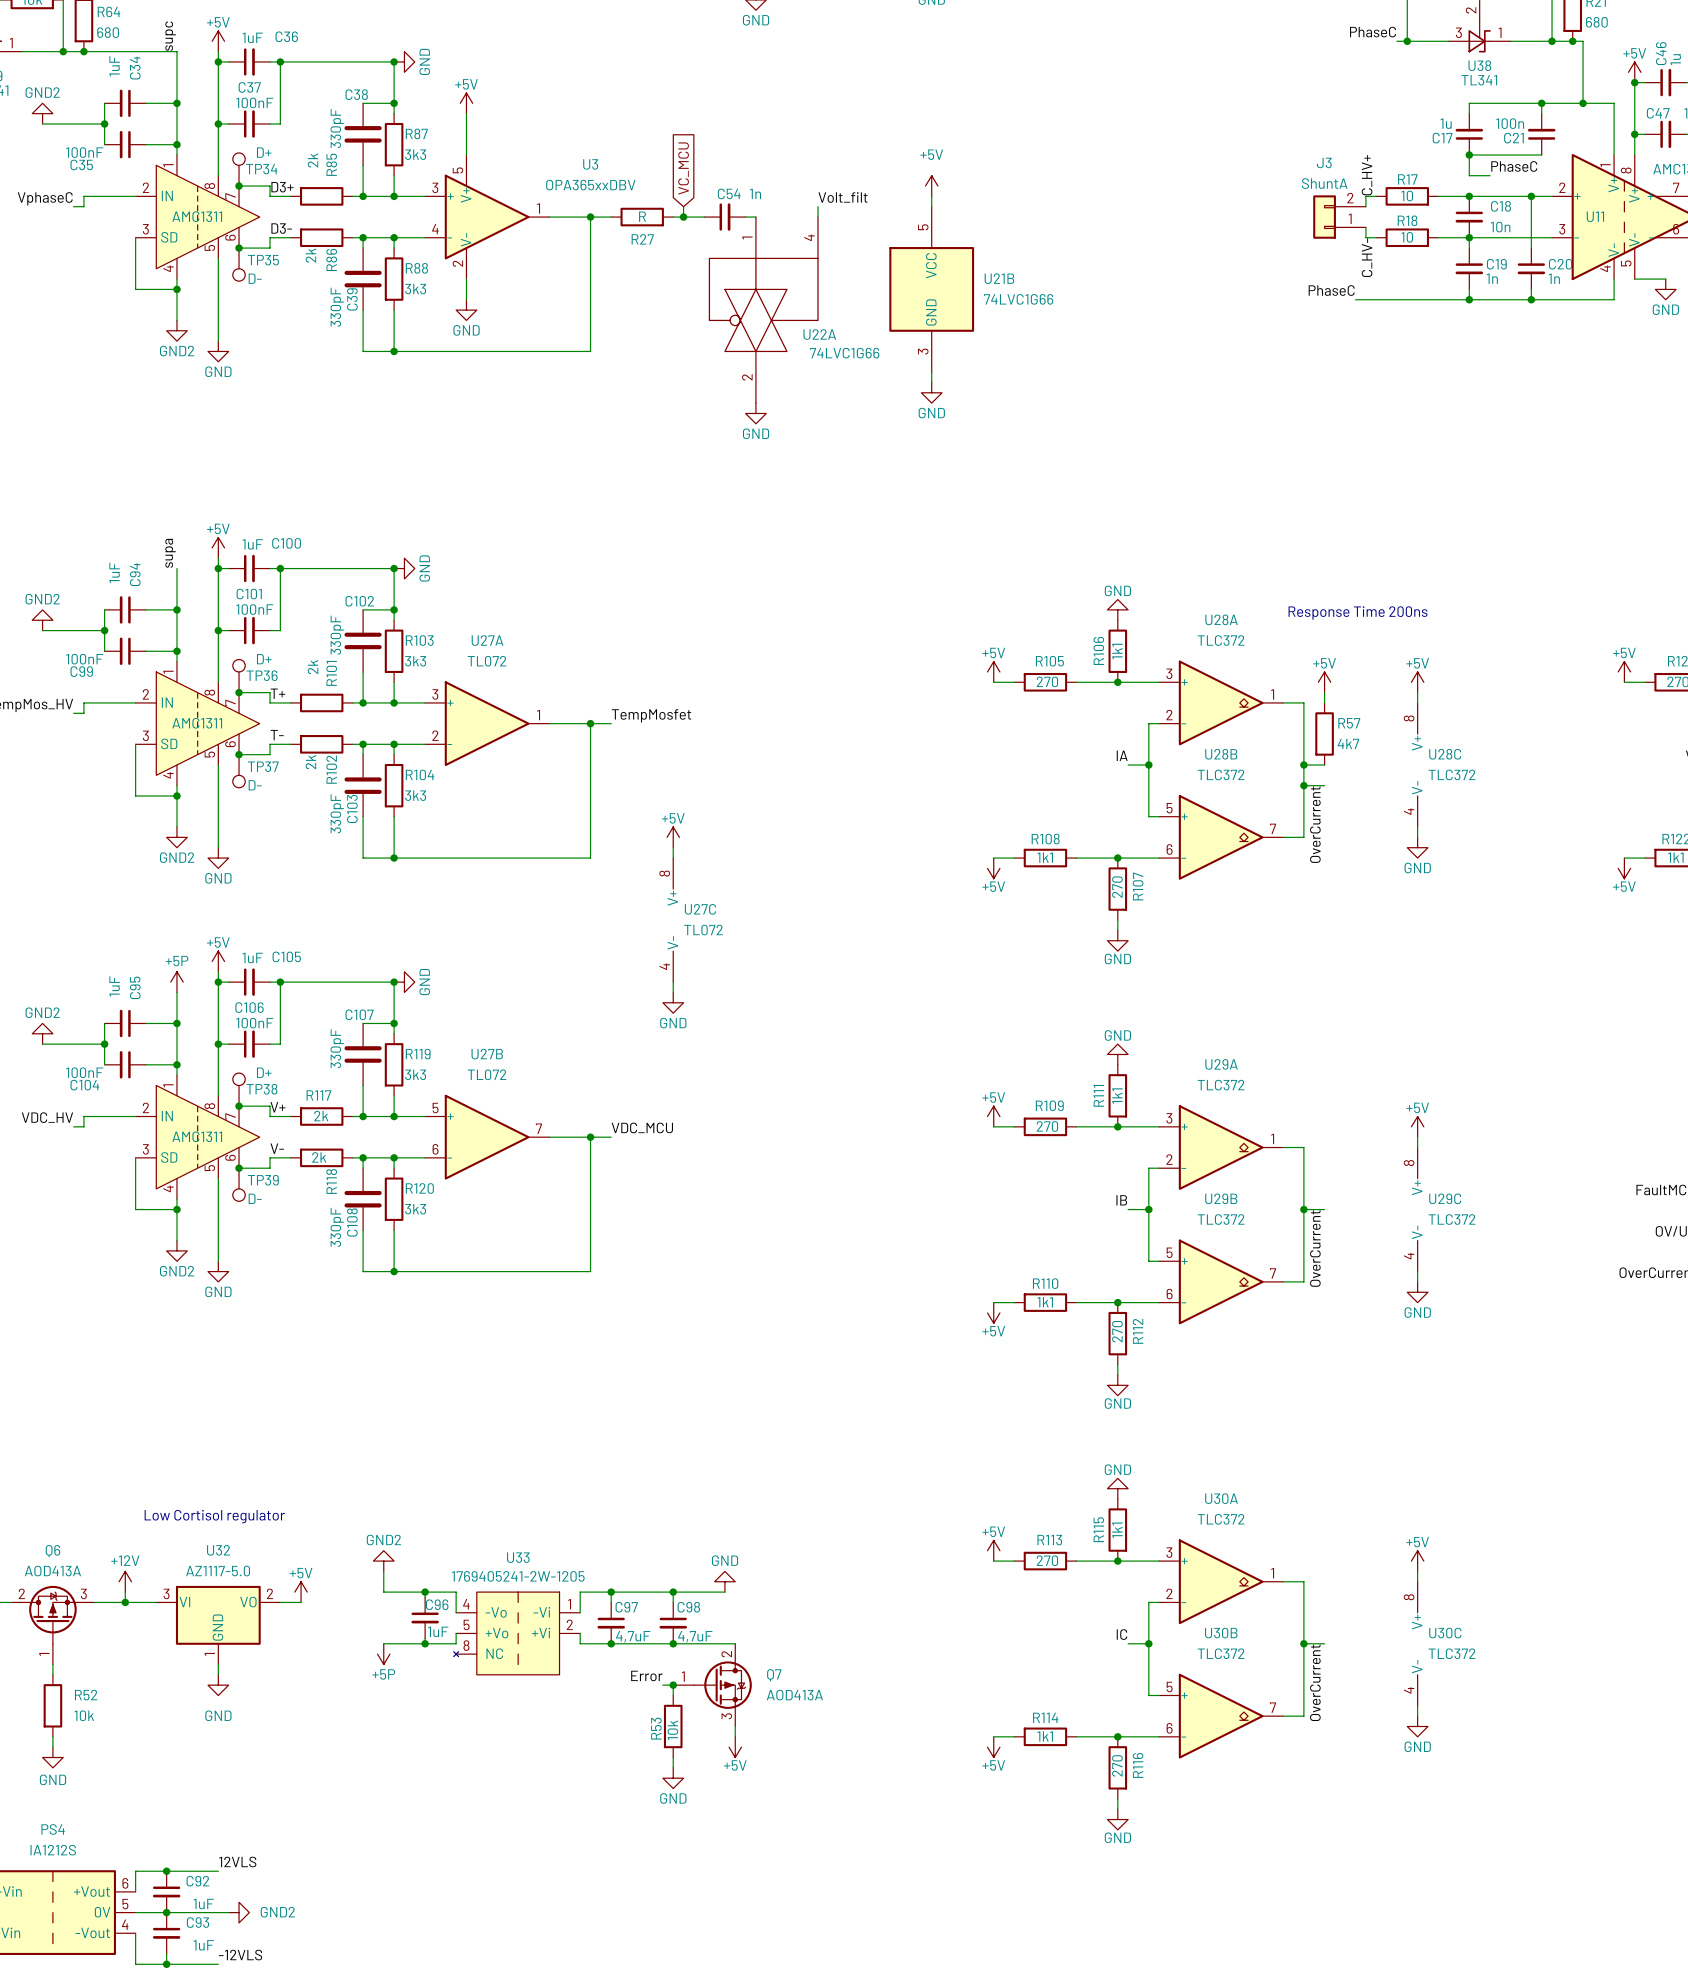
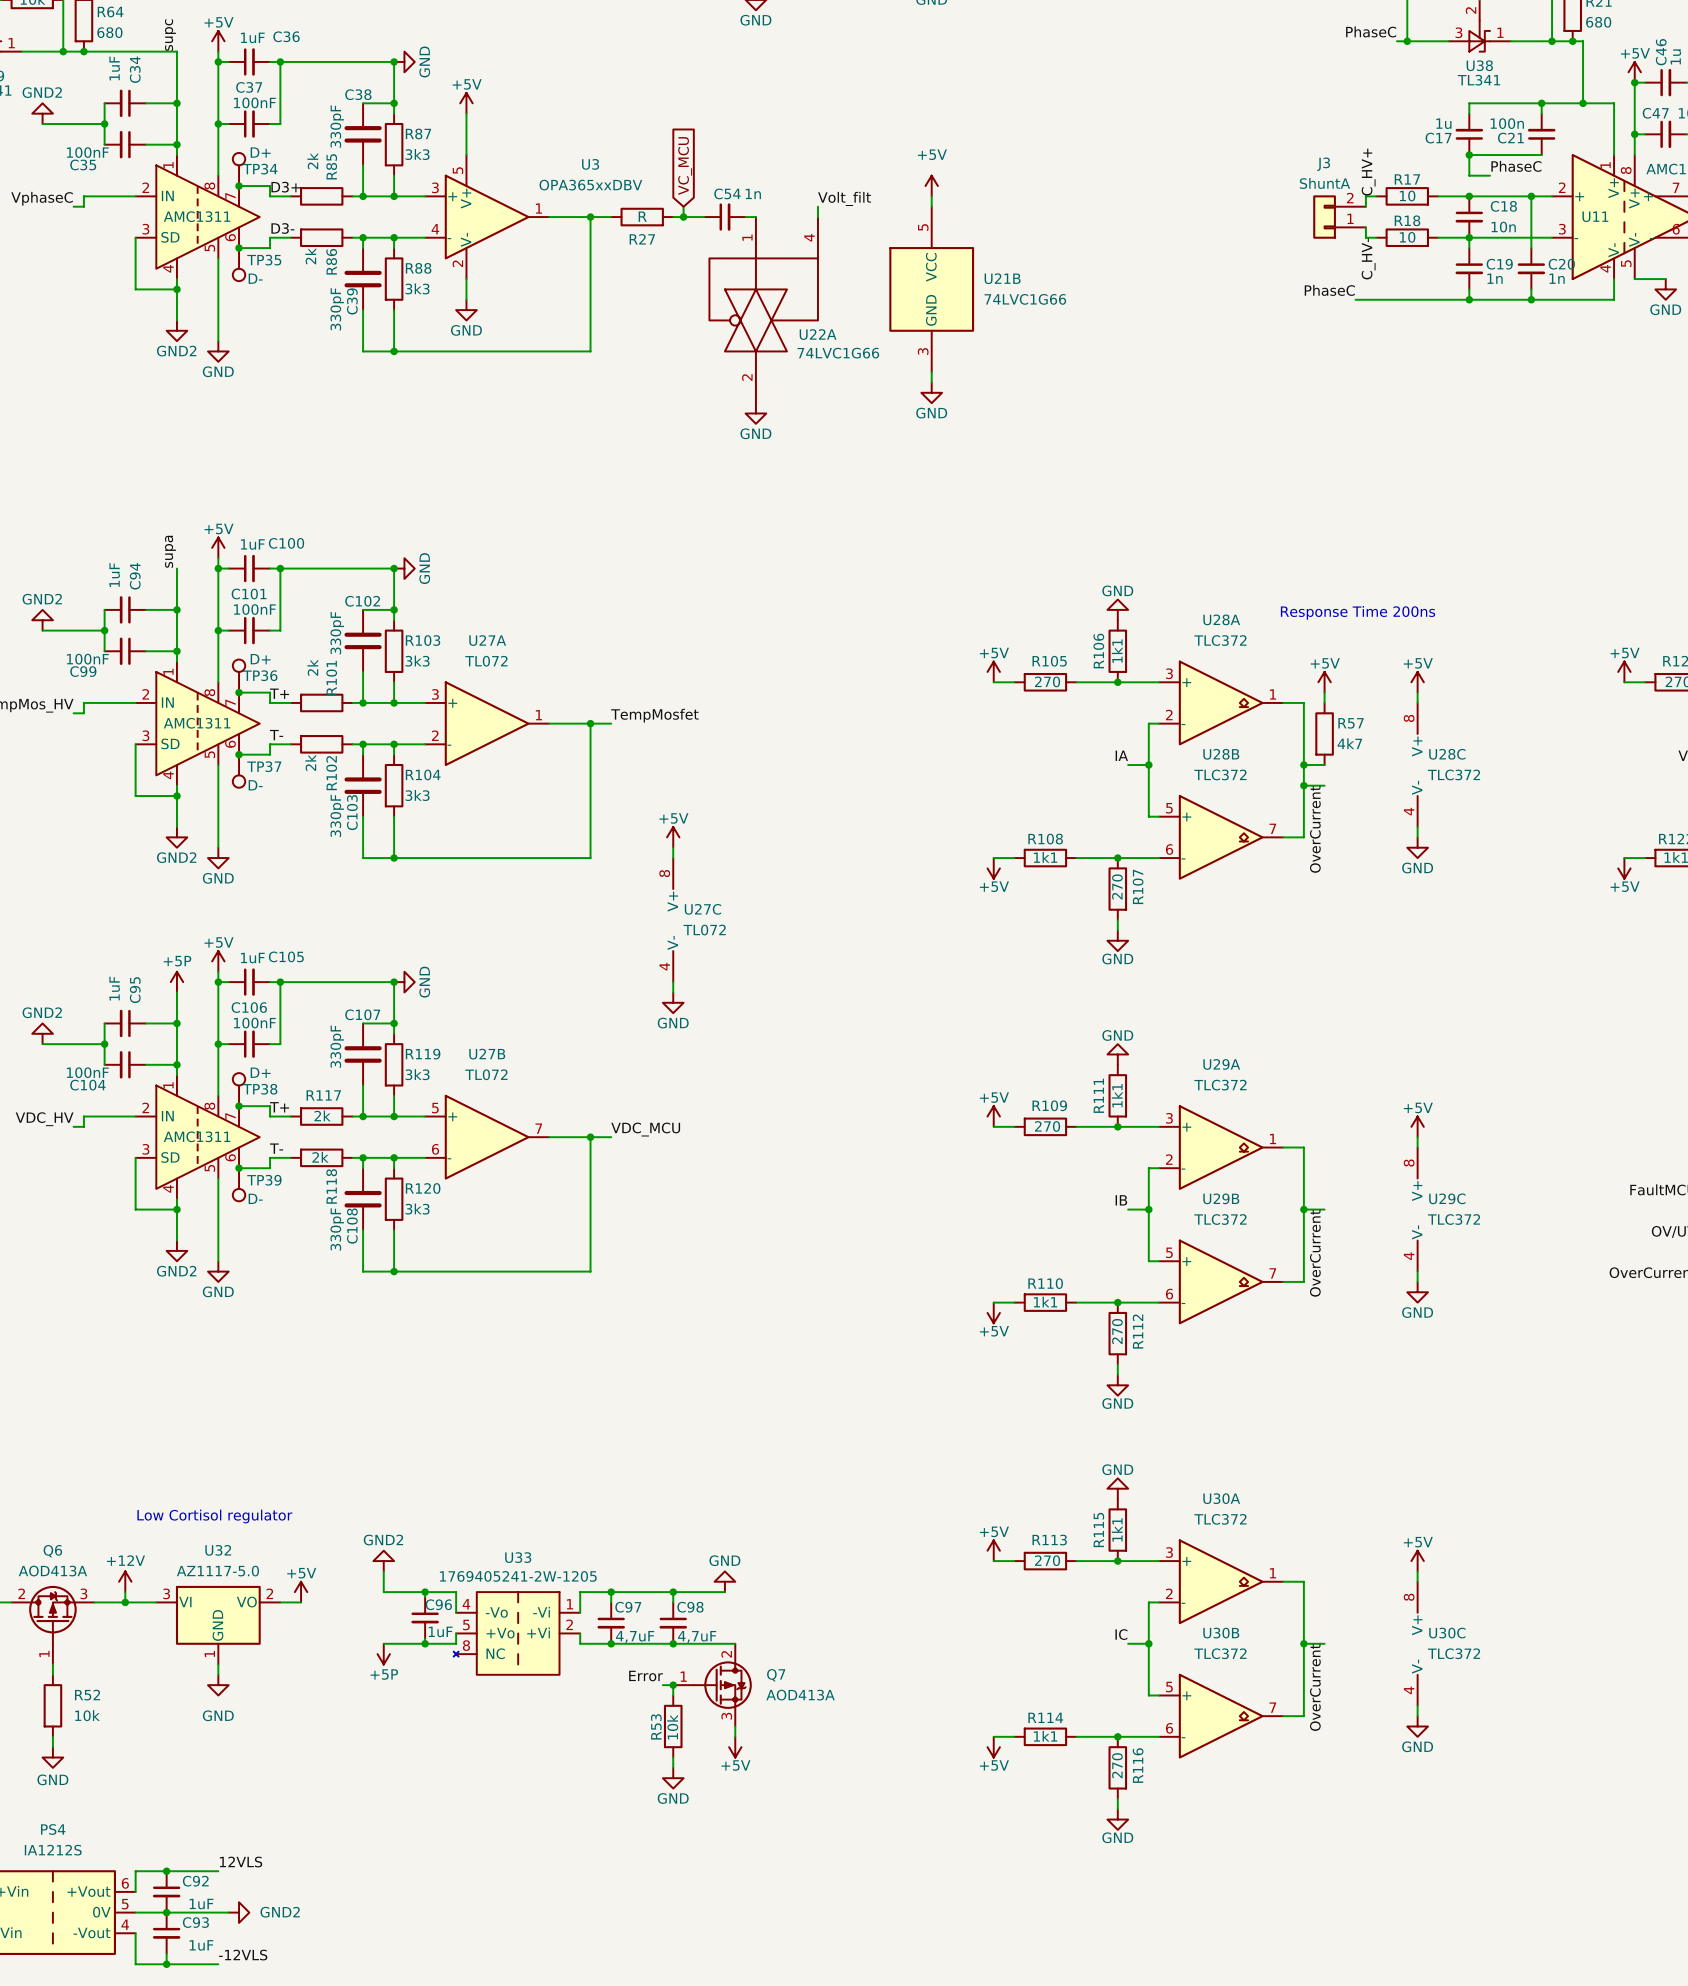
label: V+ (278, 1107) -> T+ (279, 1107)
label: V- (277, 1148) -> T- (276, 1148)

